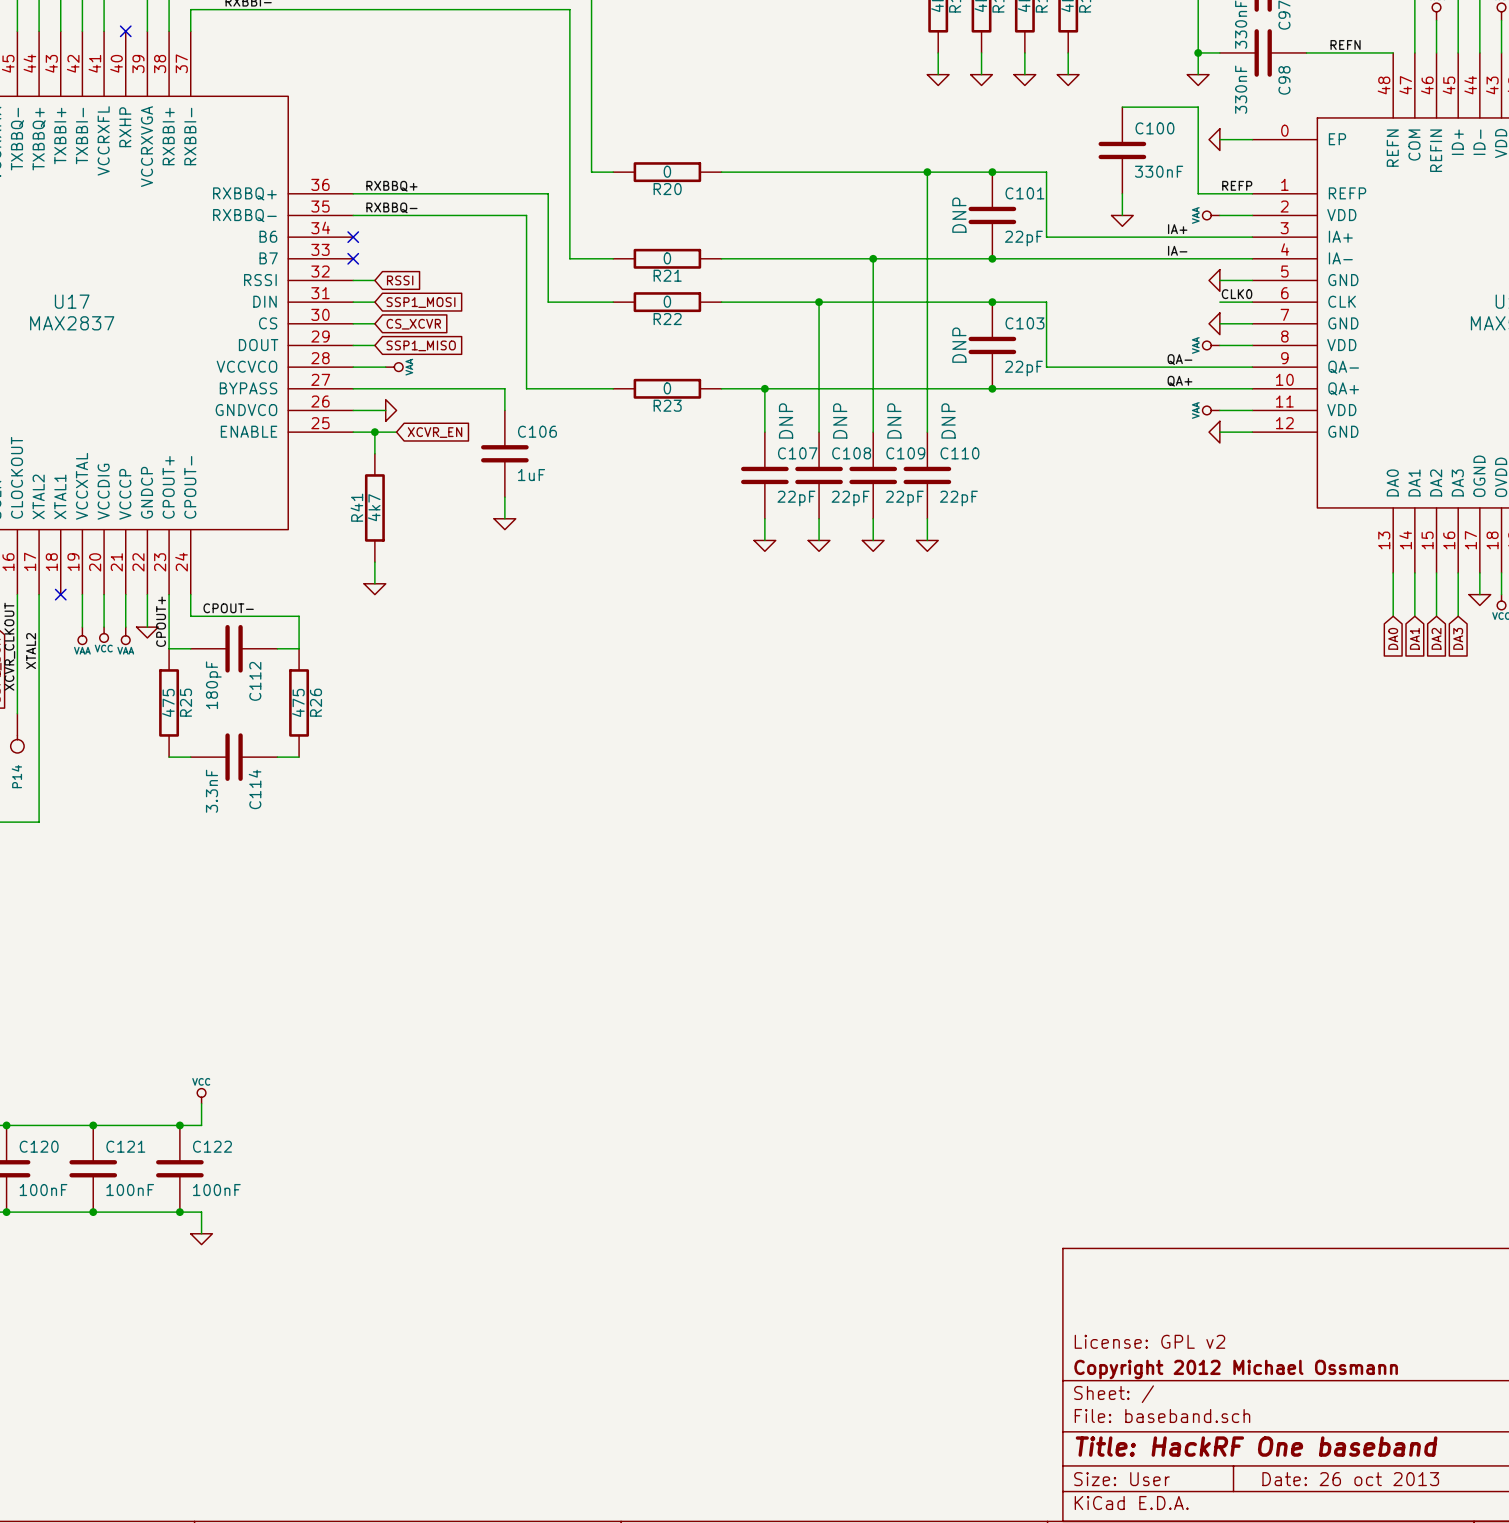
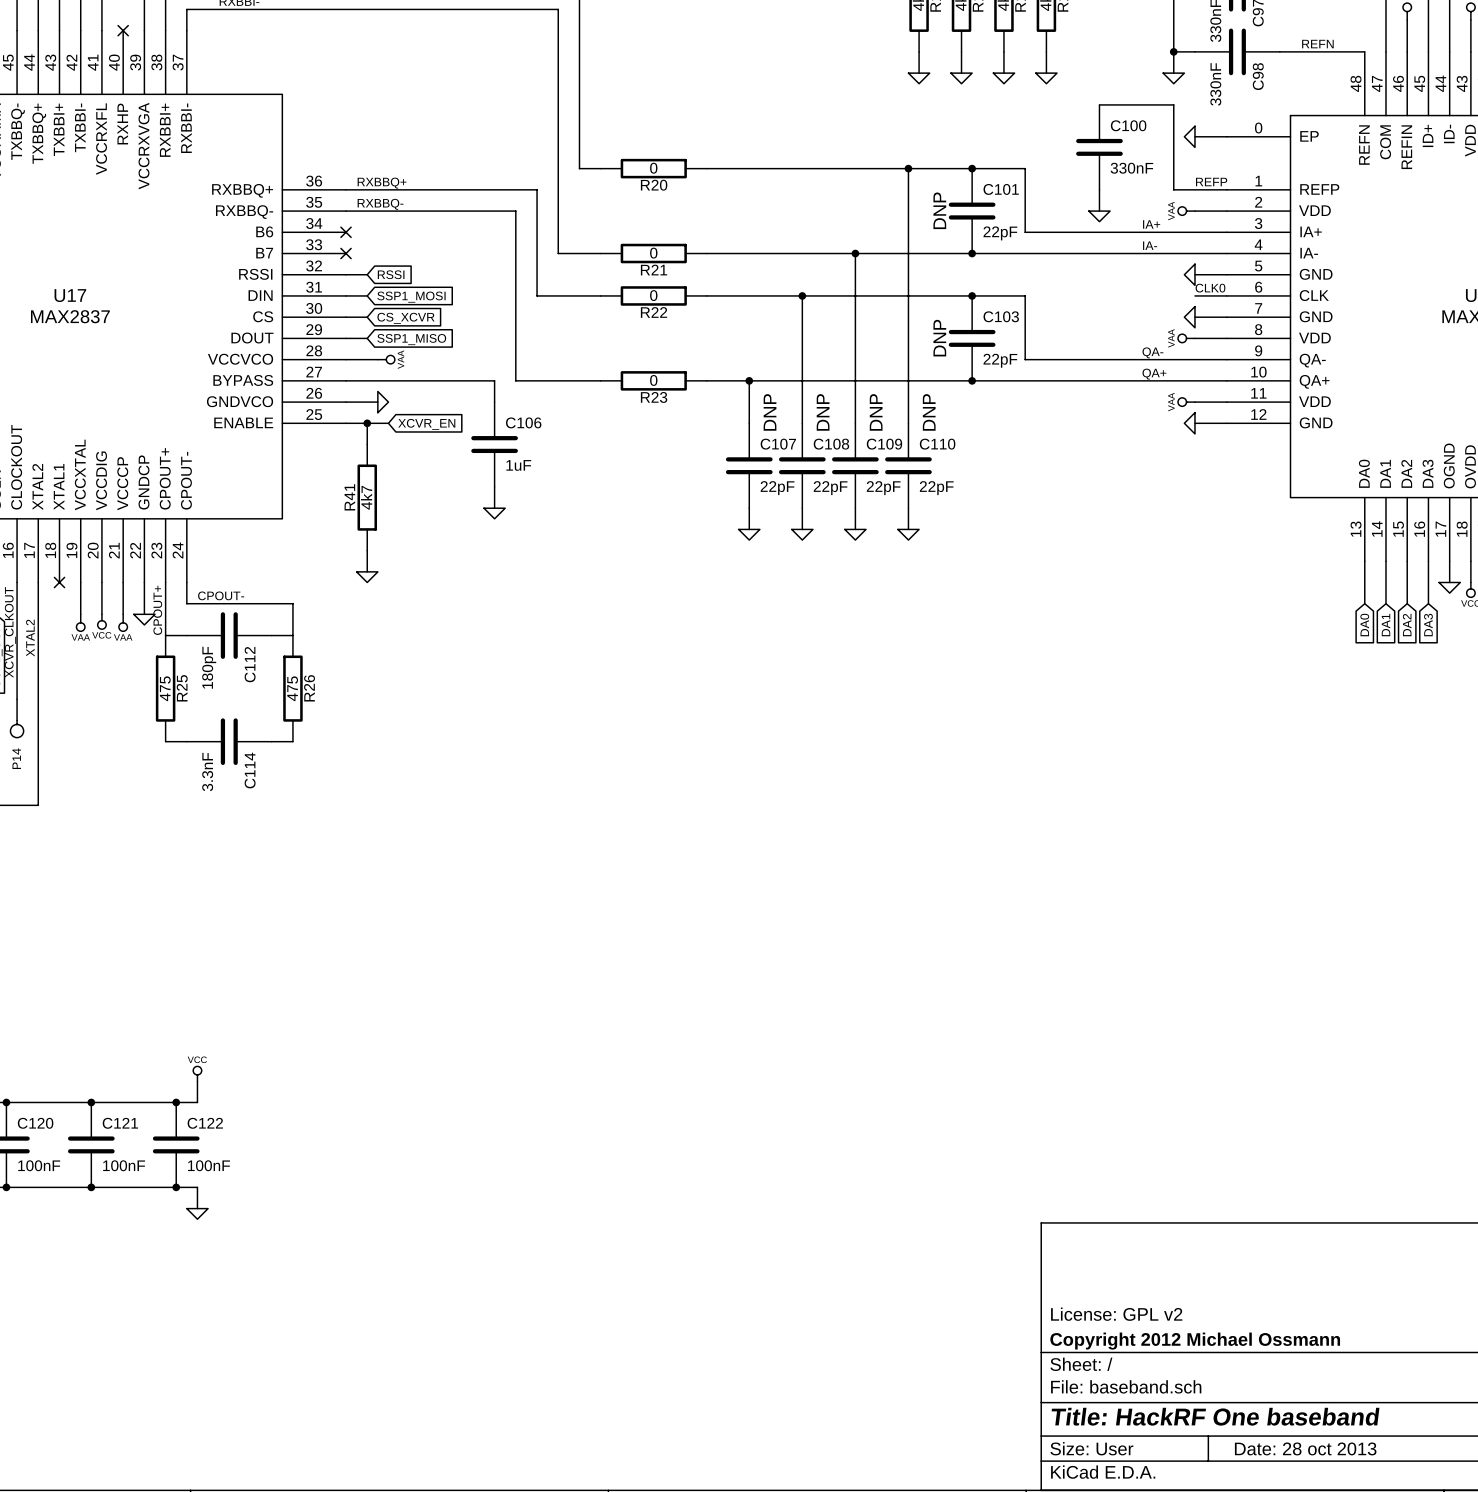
title block: Date: 26 oct 2013 (1350, 1479) -> Date: 28 oct 2013 (1305, 1448)

